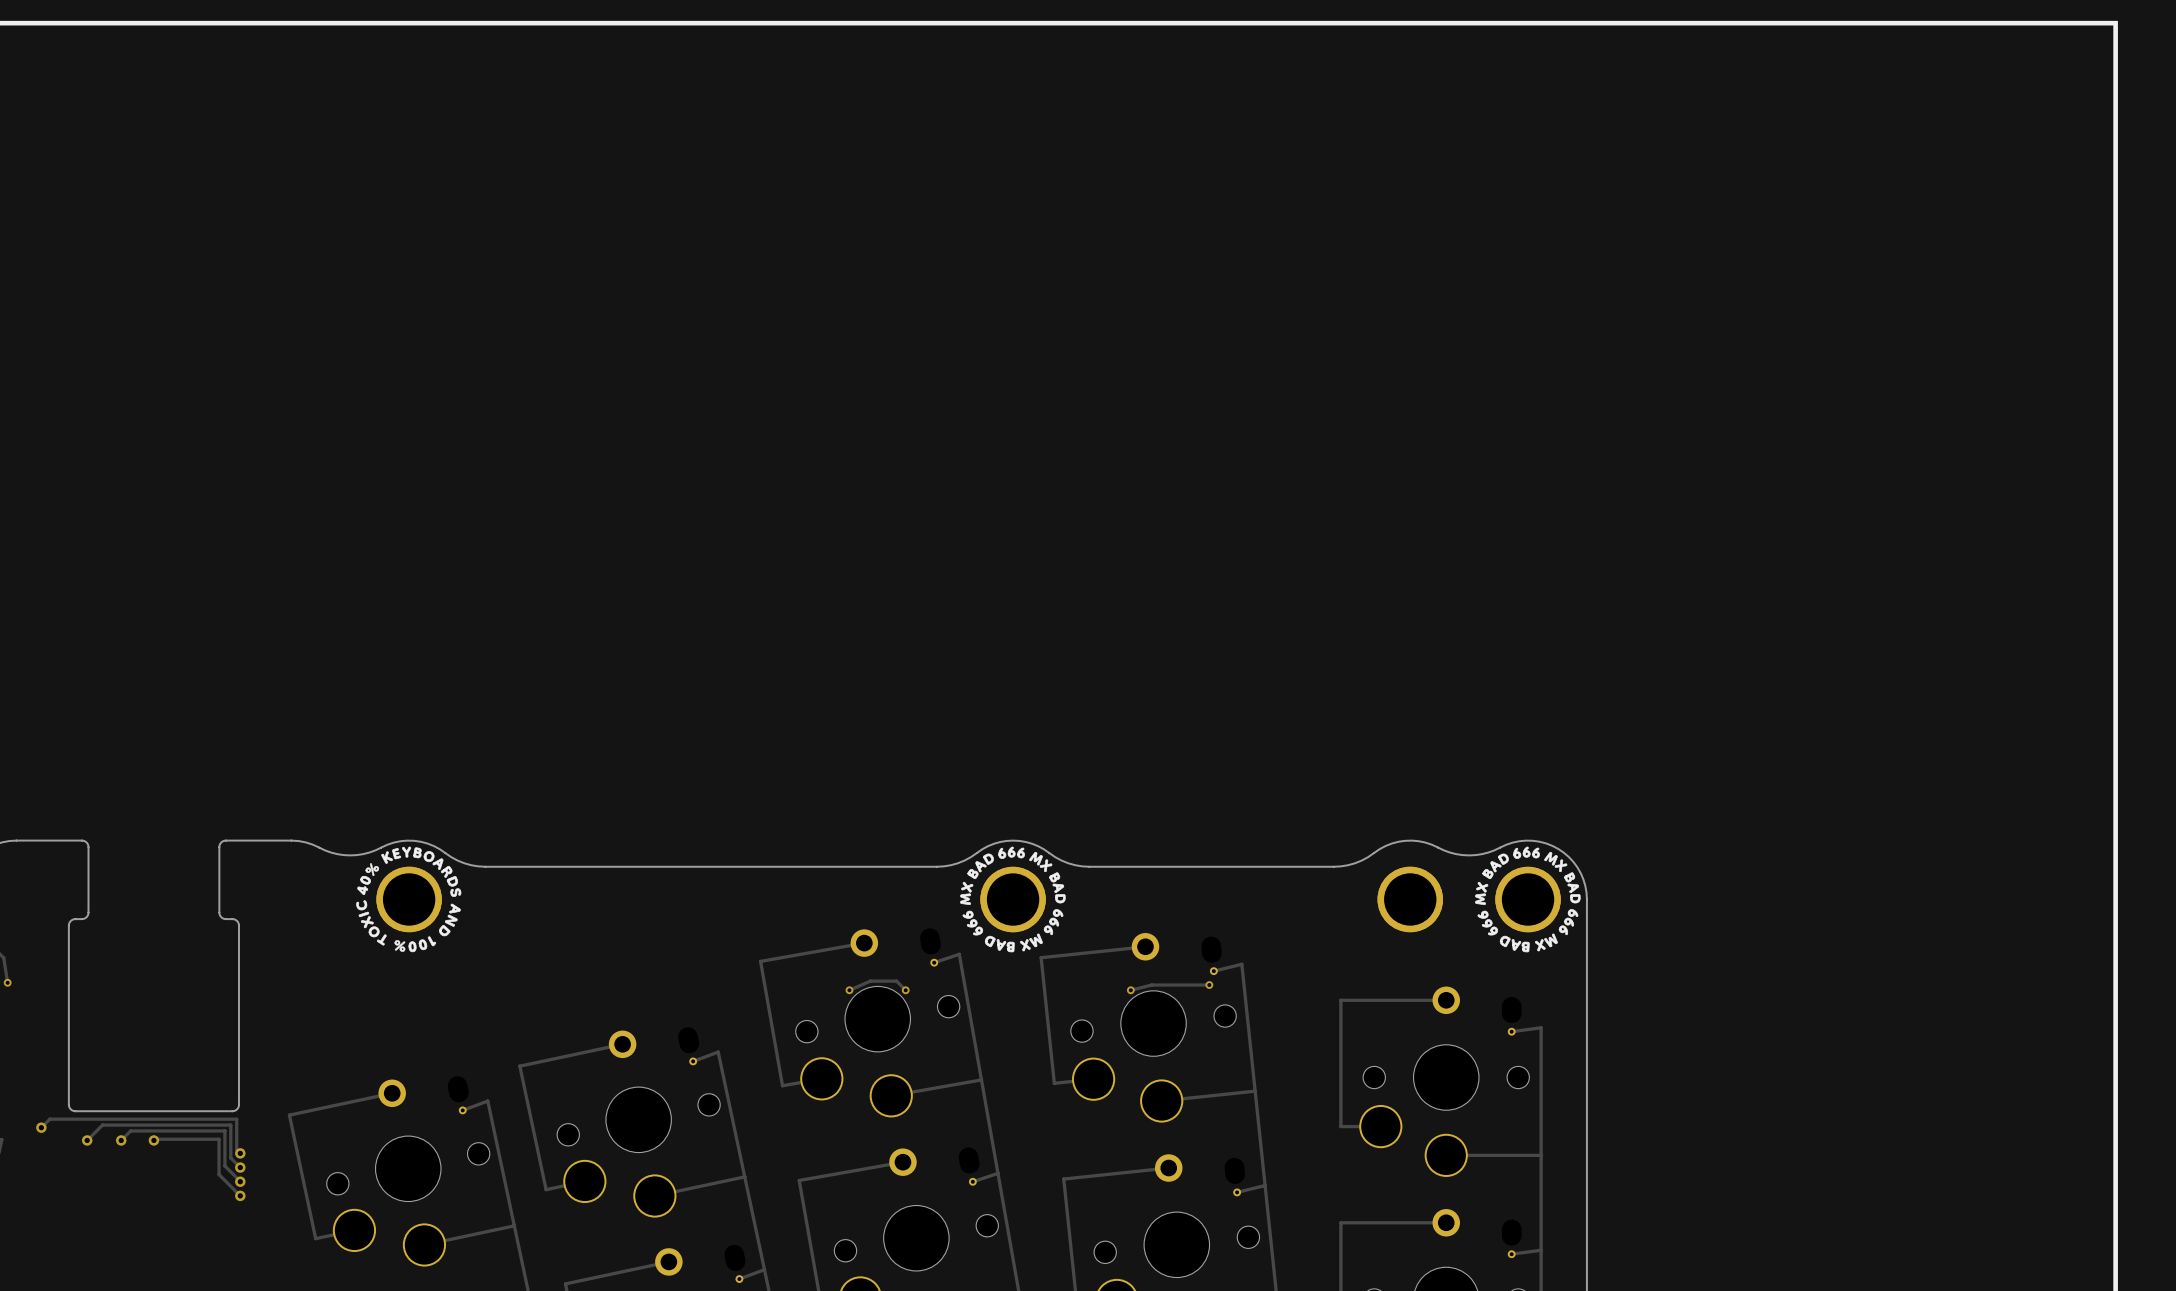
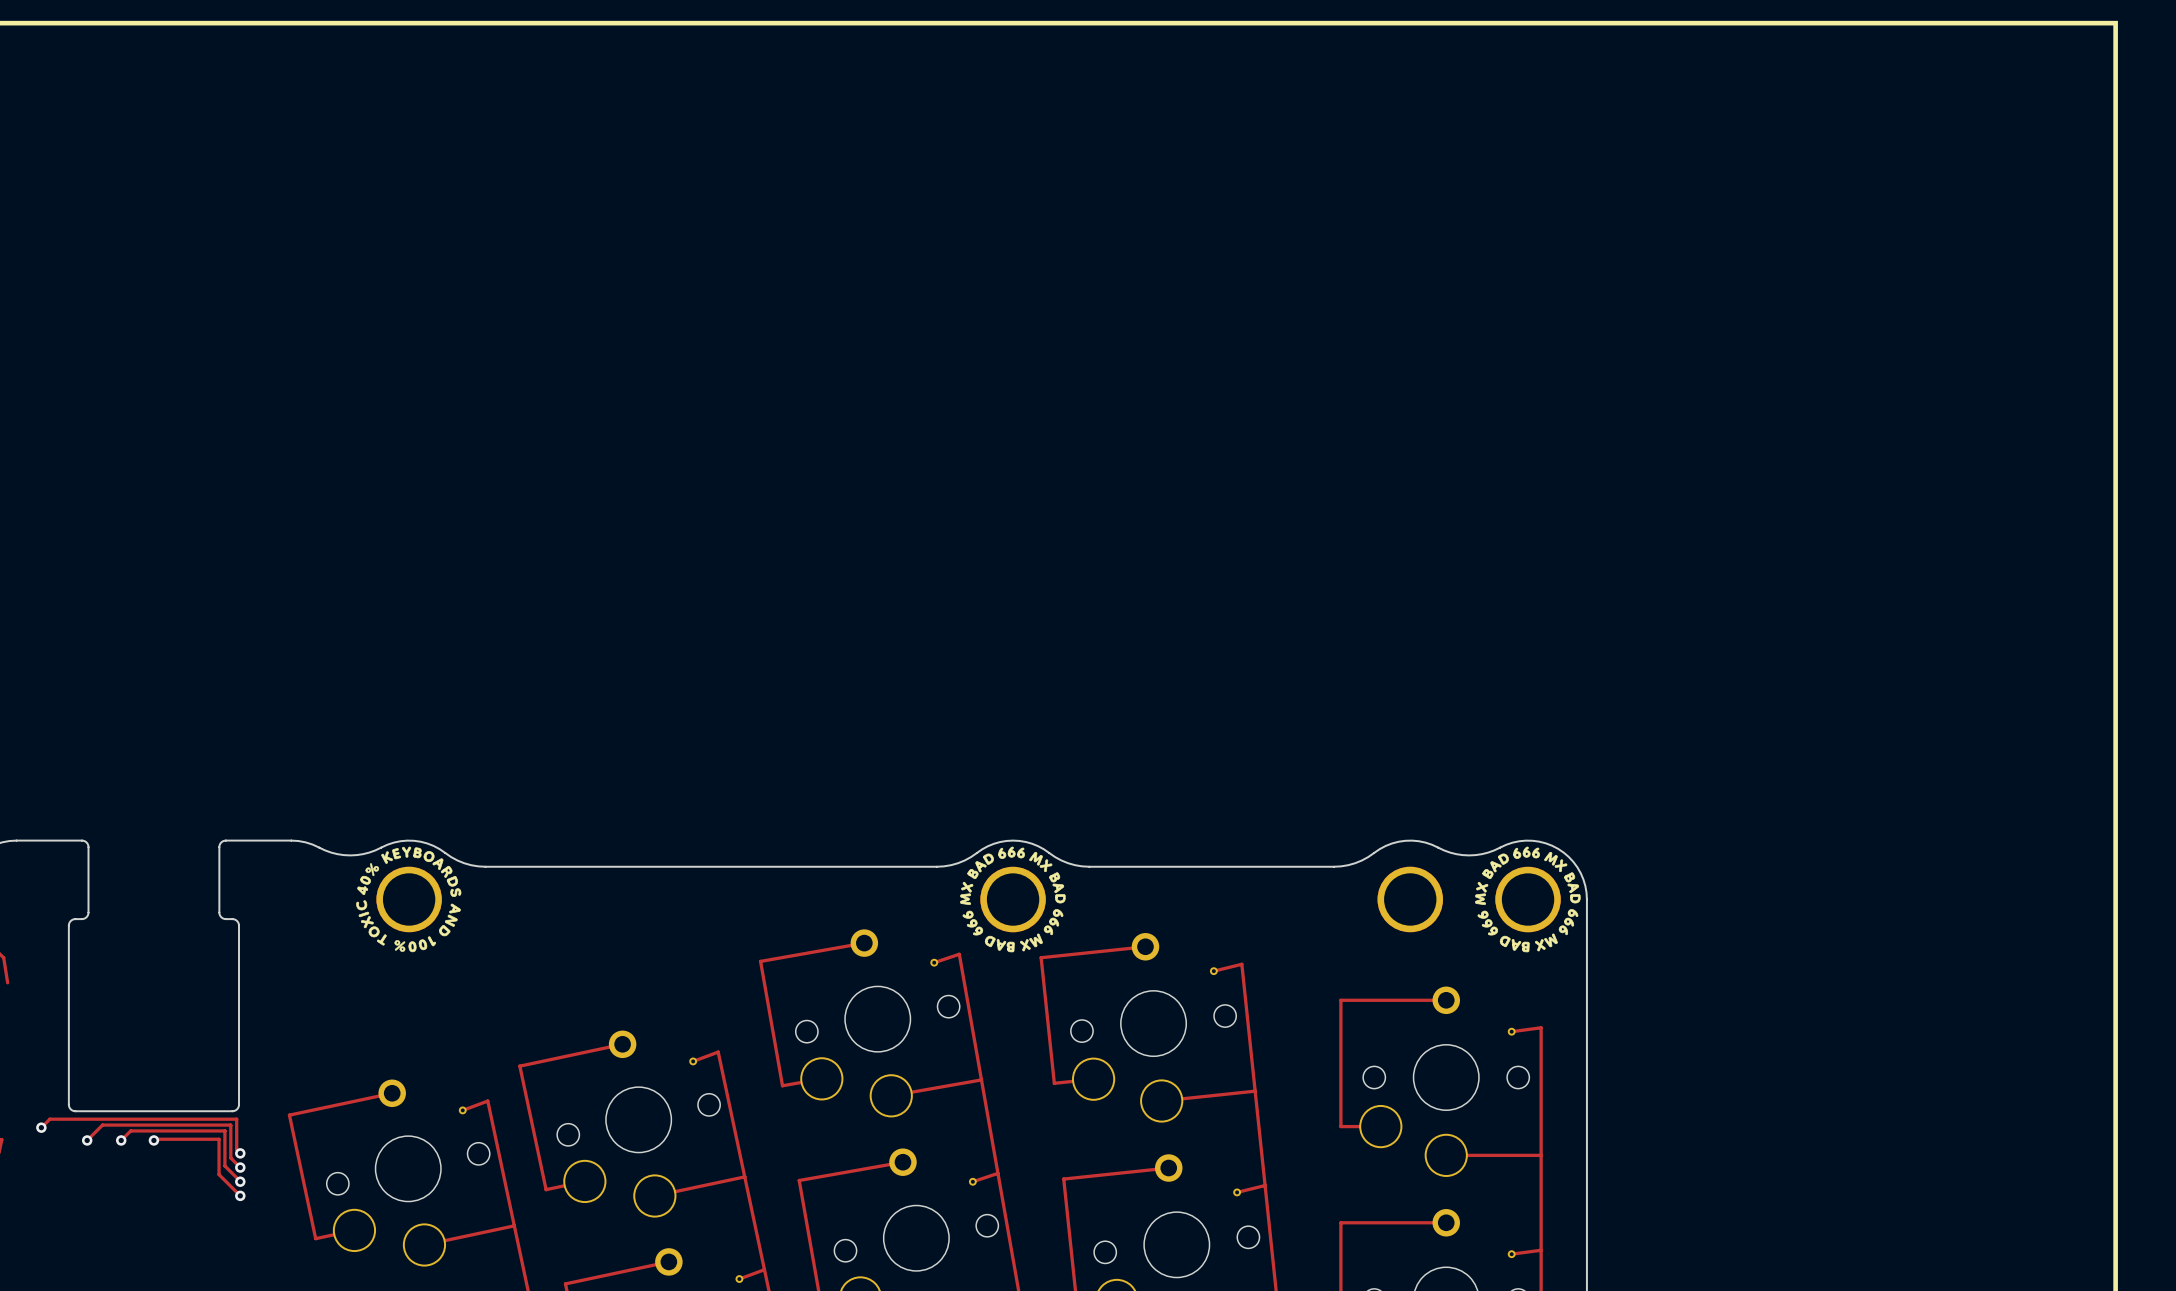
via: (7, 982) -> none
track: (1209, 985) (1151, 985) (1130, 990) -> none
via: (1209, 985) -> none
track: (849, 990) (870, 981) (896, 981) (905, 990) -> none
via: (849, 990) -> none
via: (905, 990) -> none
via: (1130, 990) -> none

